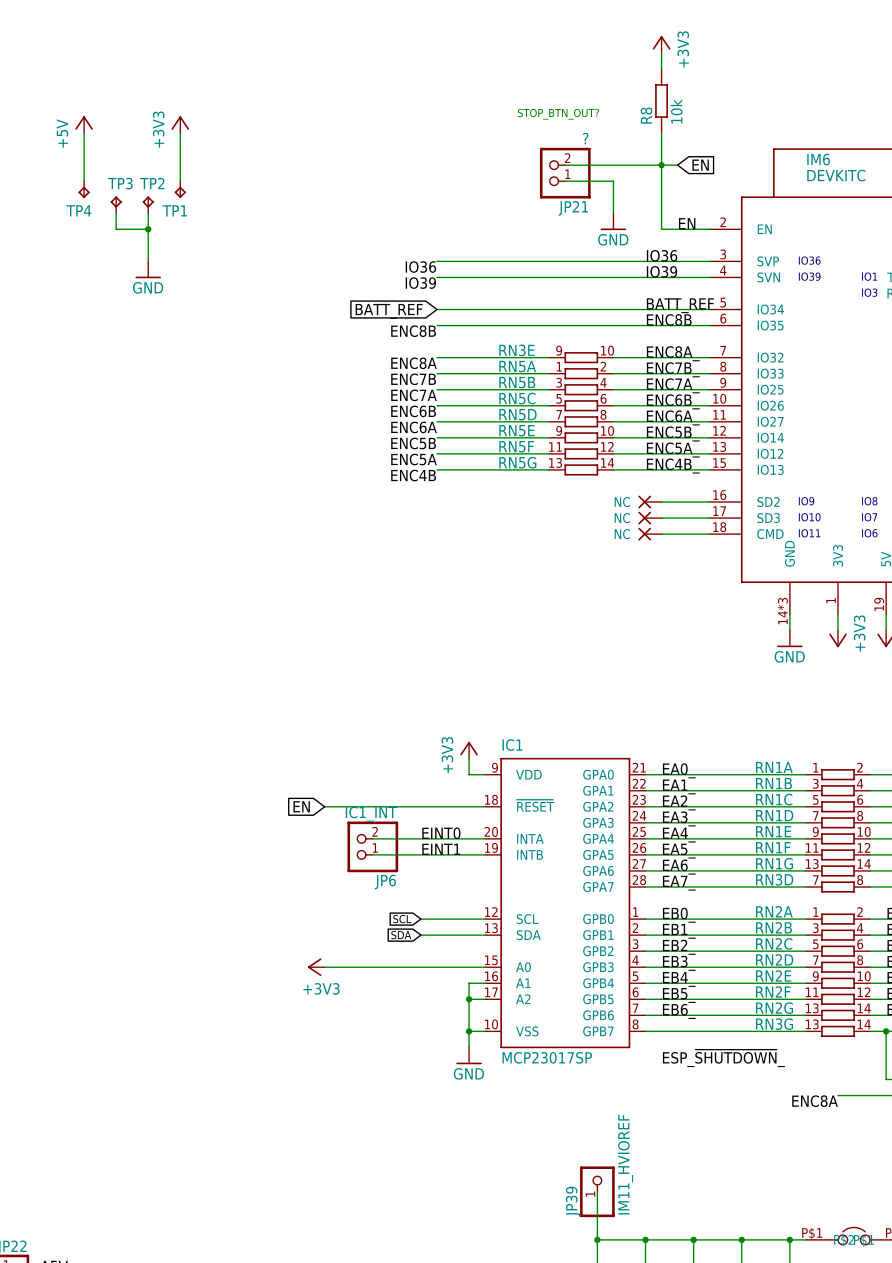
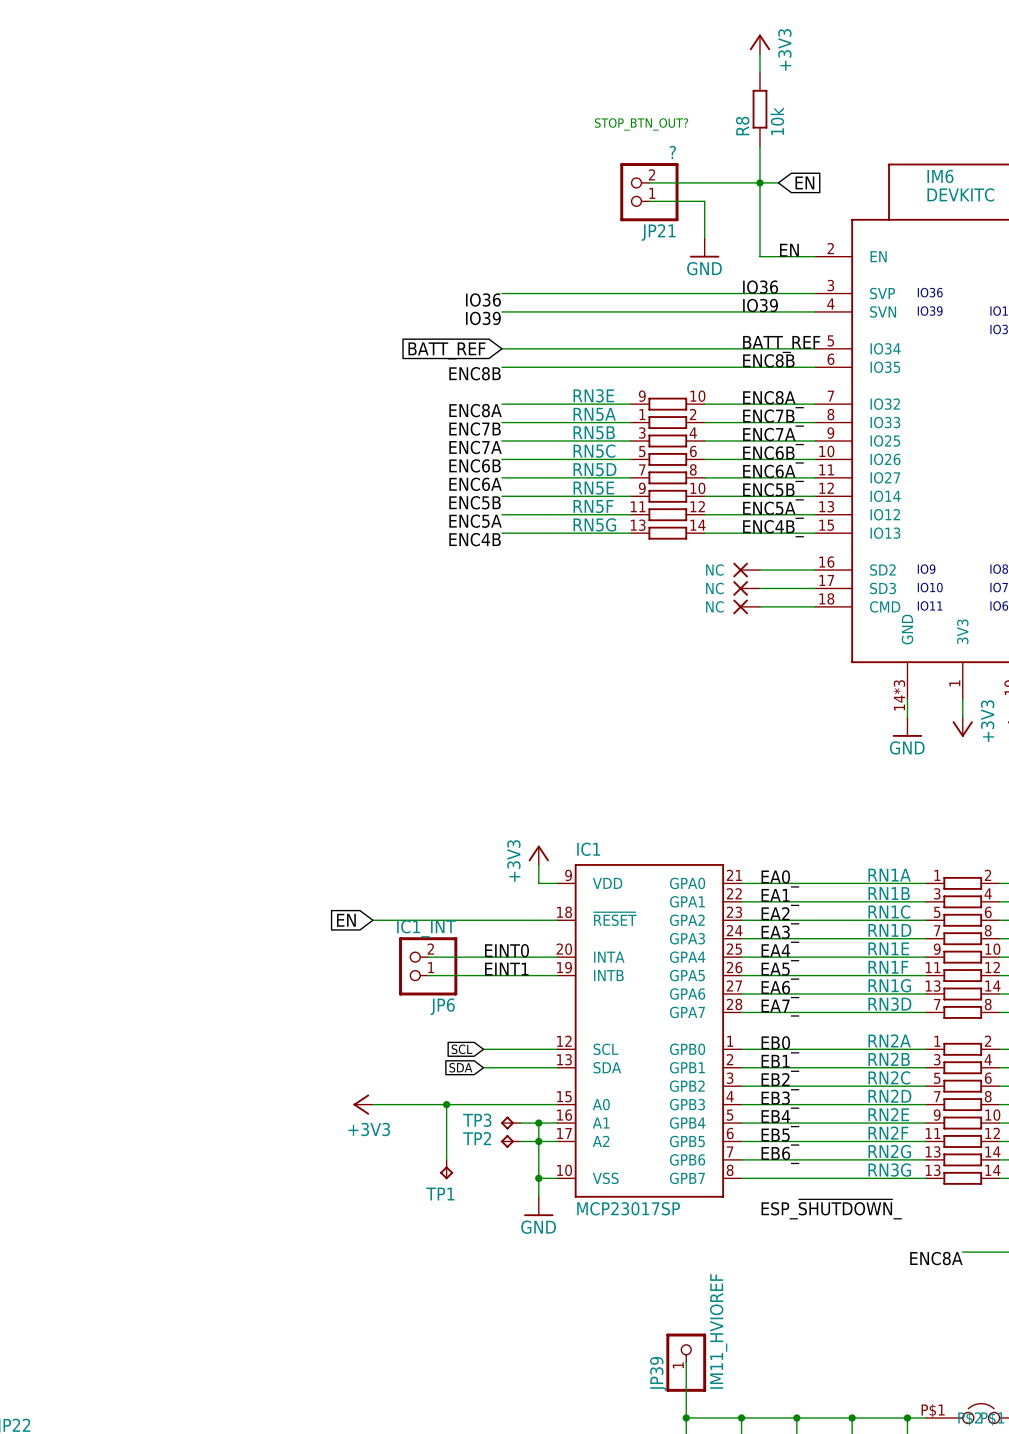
power symbol: +5V (84, 124) -> none
power symbol: +3V3 (180, 124) -> none
wire: (84, 133) (84, 181) -> none
wire: (180, 133) (180, 181) -> none
TP3 name position: TP3 (120, 183) -> TP3 (477, 1120)
TP2 name position: TP2 (152, 183) -> TP2 (477, 1138)
TP4: (84, 189) -> none
TP1 position: (180, 189) -> (446, 1169)
TP3 rotation: 0° (116, 202) -> 90° counterclockwise (507, 1123)
TP2 rotation: 0° (148, 202) -> 90° counterclockwise (507, 1141)
TP3 position: (116, 204) -> (510, 1123)
TP2 position: (148, 204) -> (510, 1141)
wire: (116, 213) (116, 229) (148, 229) -> none
wire: (148, 213) (148, 261) -> none
junction: (148, 229) -> none
power symbol: GND (148, 269) -> none
wire: none -> (446, 1104) (446, 1159)
junction: none -> (446, 1104)
wire: none -> (520, 1123) (538, 1123)
junction: none -> (538, 1123)
wire: none -> (520, 1141) (538, 1141)

